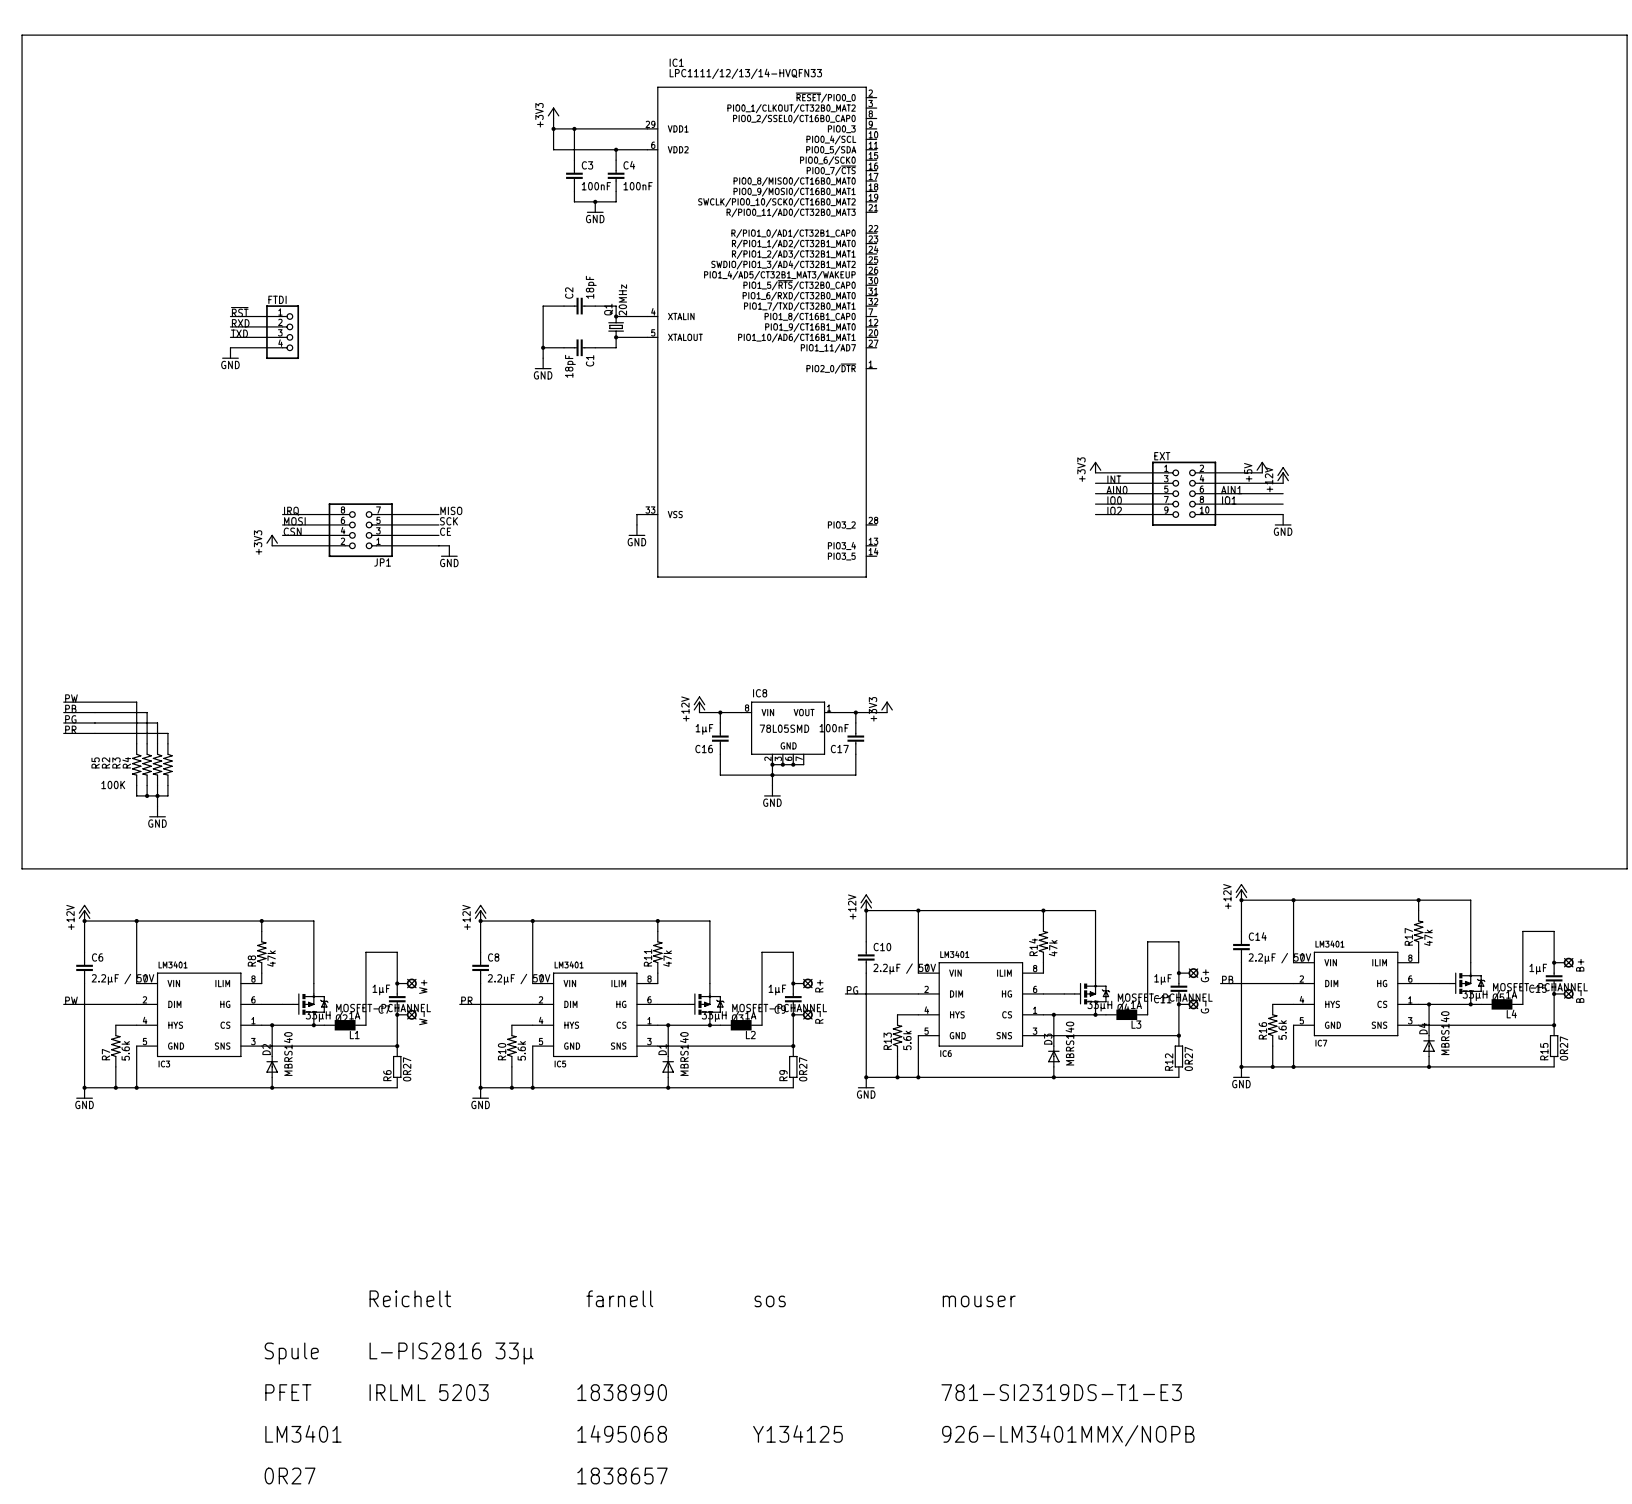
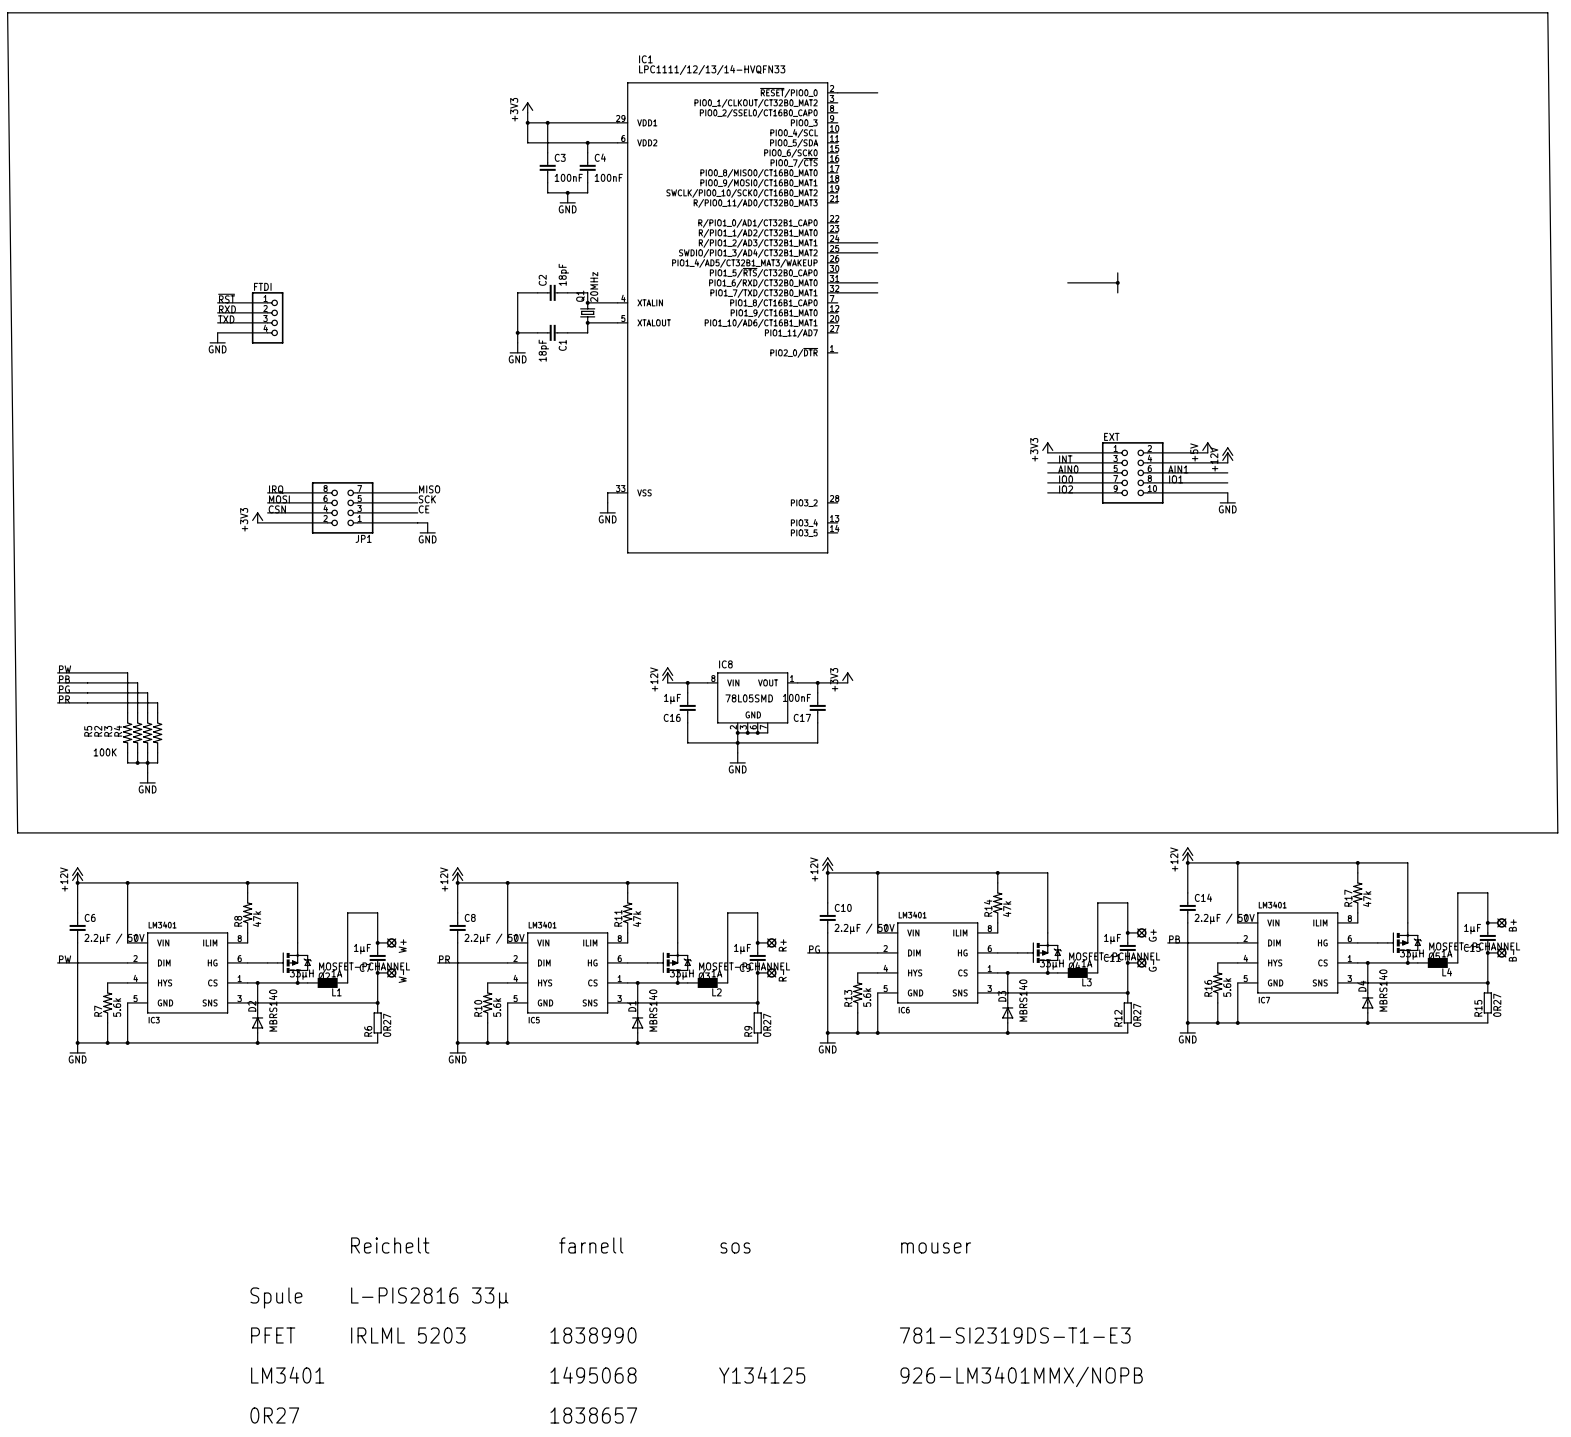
wire: none -> (837, 92) (877, 92)
wire: none -> (837, 242) (877, 242)
wire: none -> (837, 252) (877, 252)
wire: none -> (1117, 272) (1117, 292)
wire: none -> (837, 282) (877, 282)
wire: none -> (1067, 282) (1117, 282)
junction: none -> (1117, 282)
wire: none -> (837, 292) (877, 292)
line: (22, 868) (22, 35) (1627, 35) (1627, 868) -> (17, 832) (7, 12) (1547, 12) (1557, 832)

